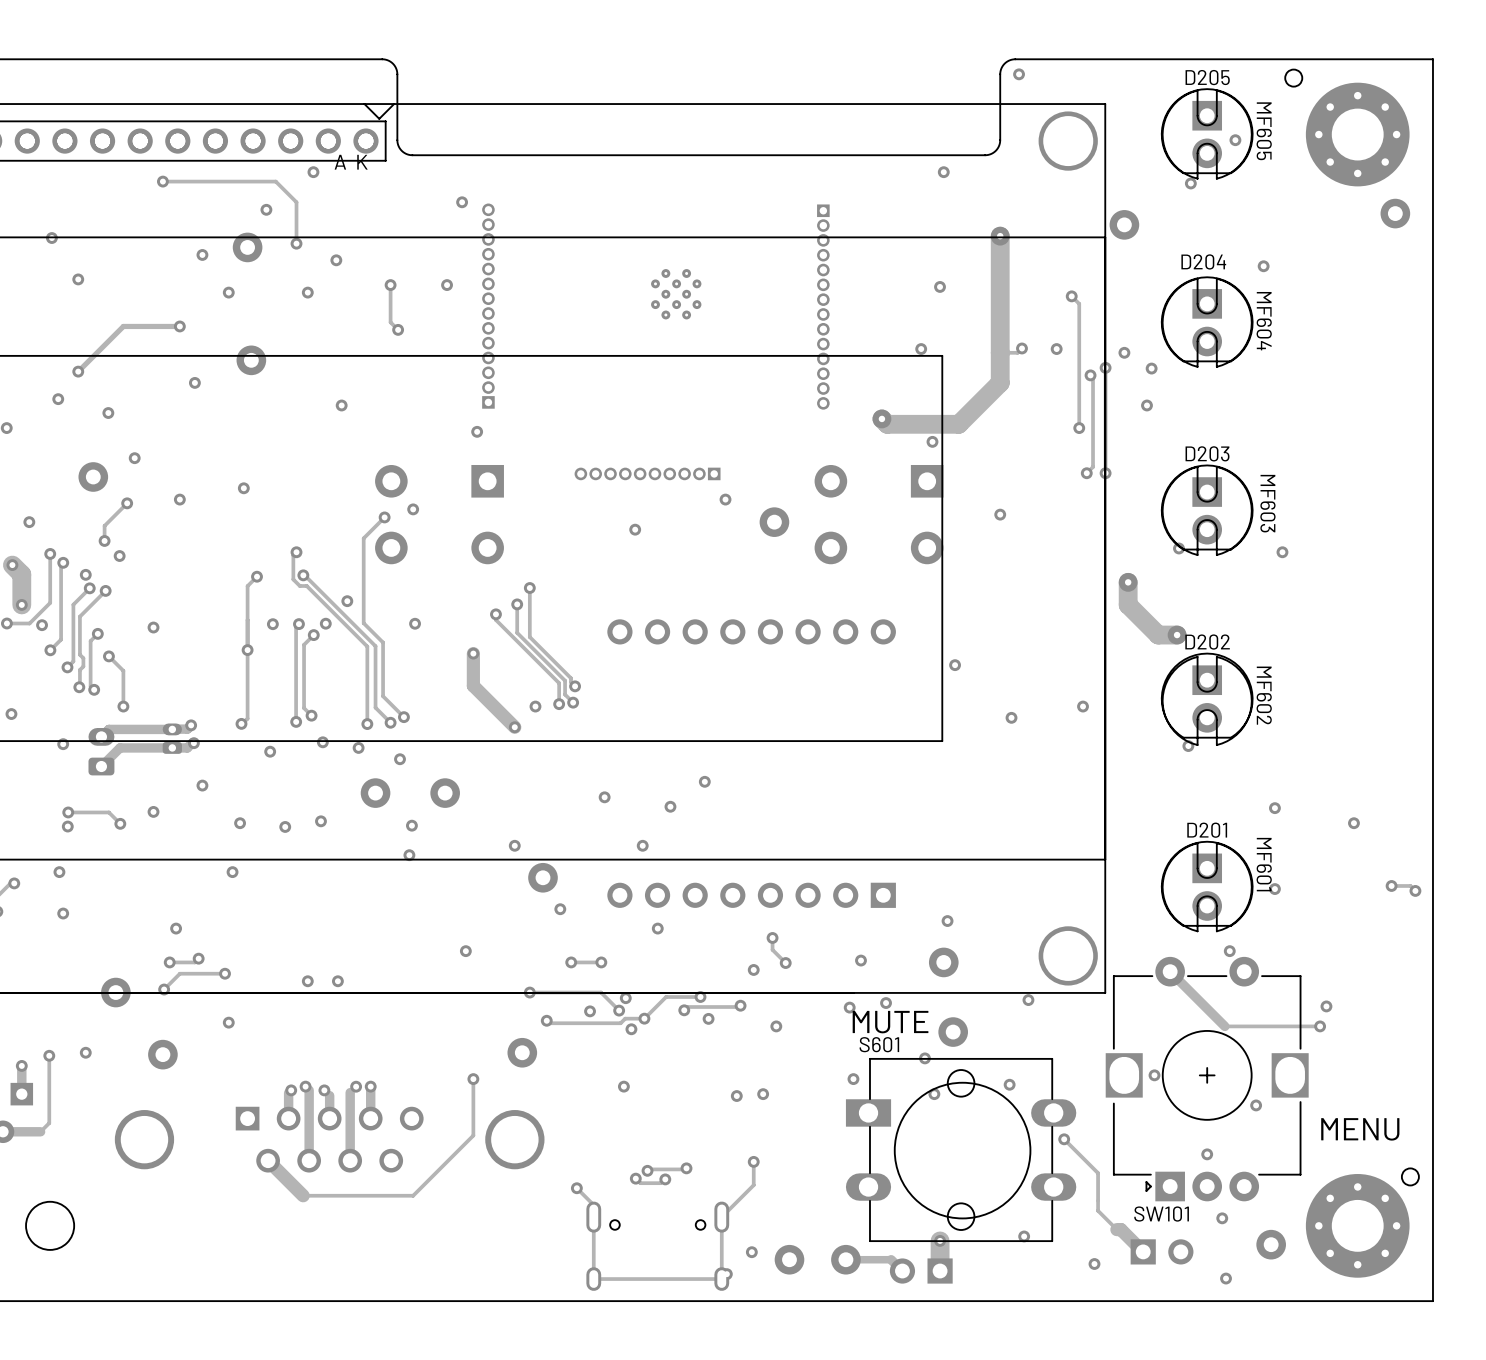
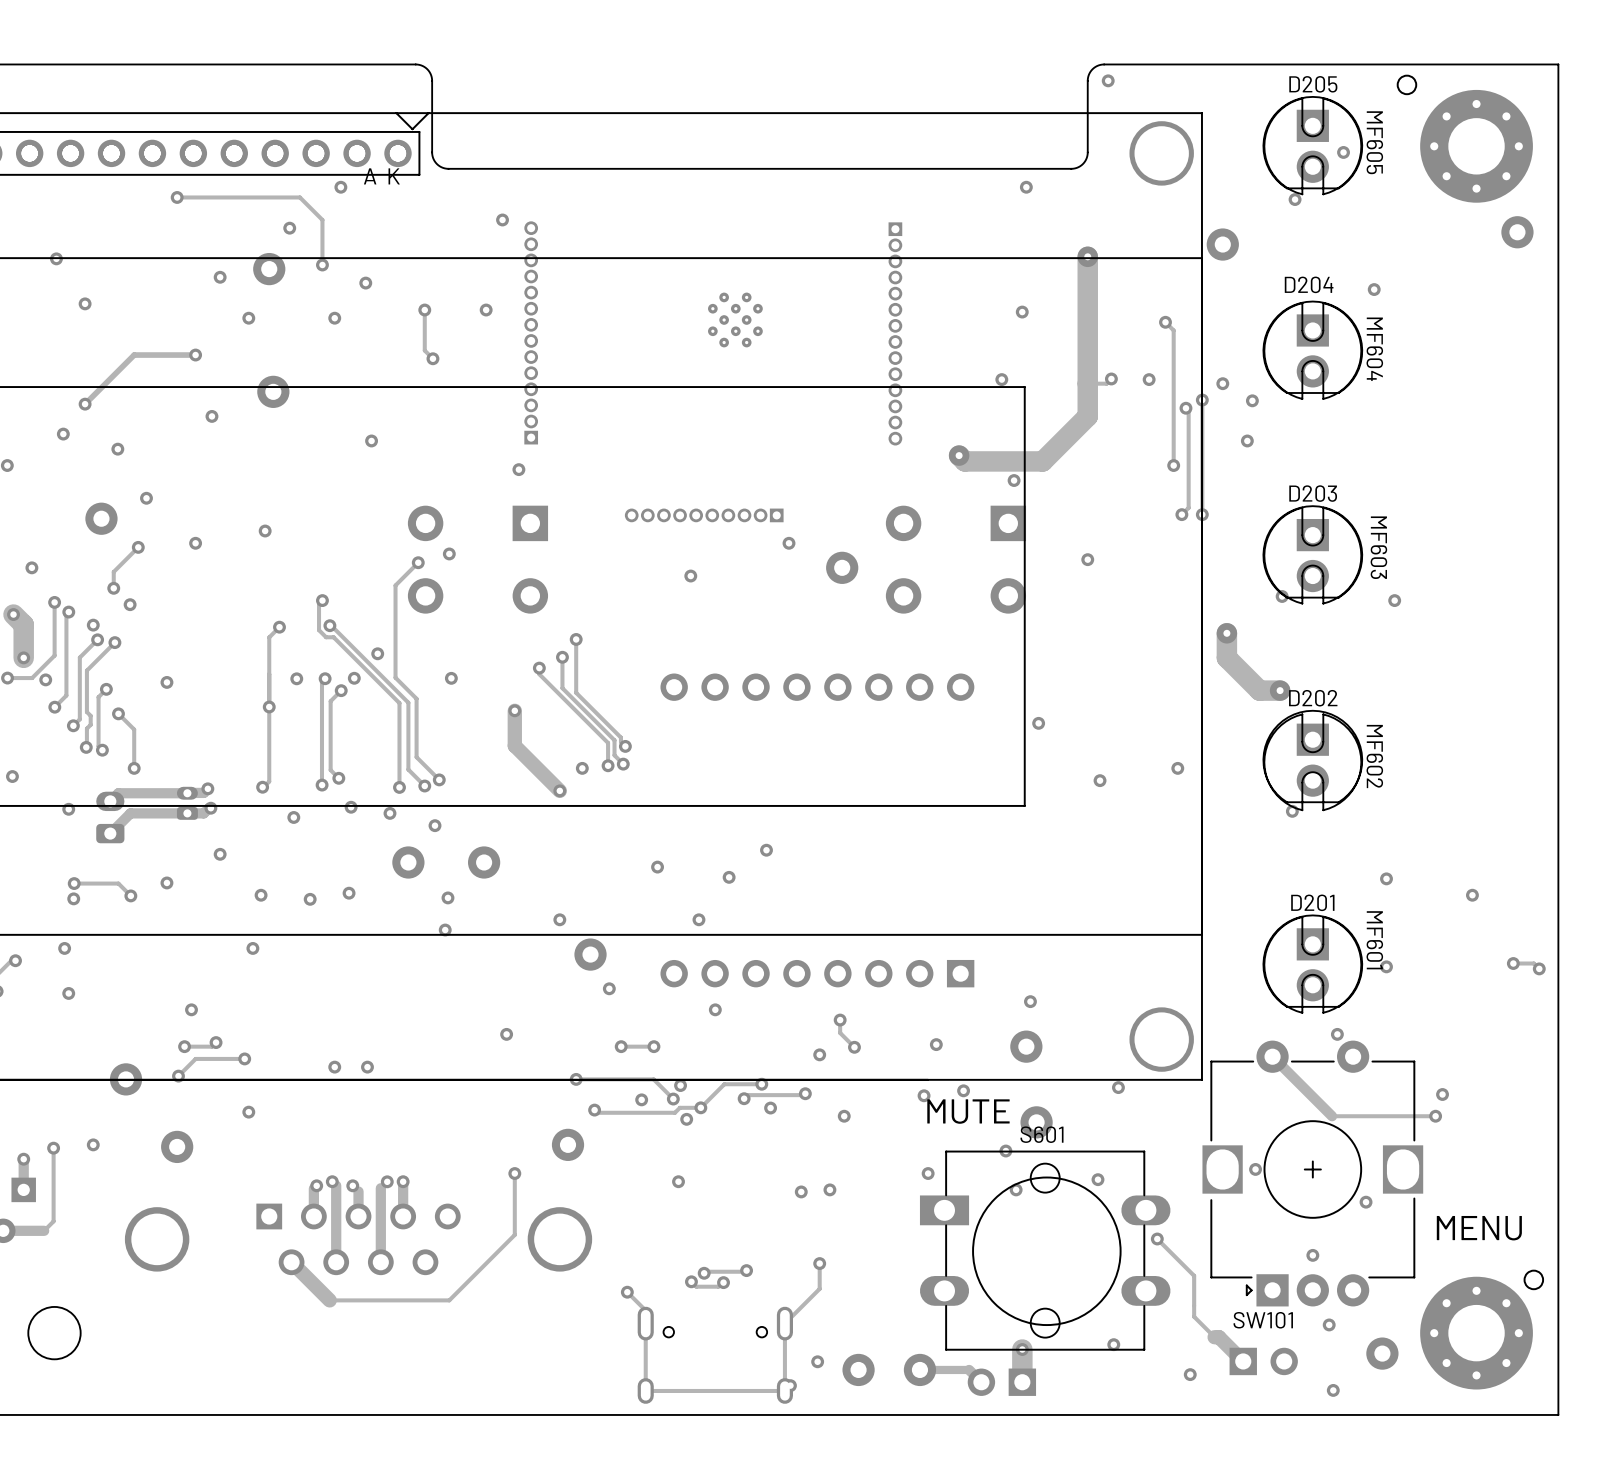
S601 name position: S601 (879, 1044) -> S601 (1042, 1134)

